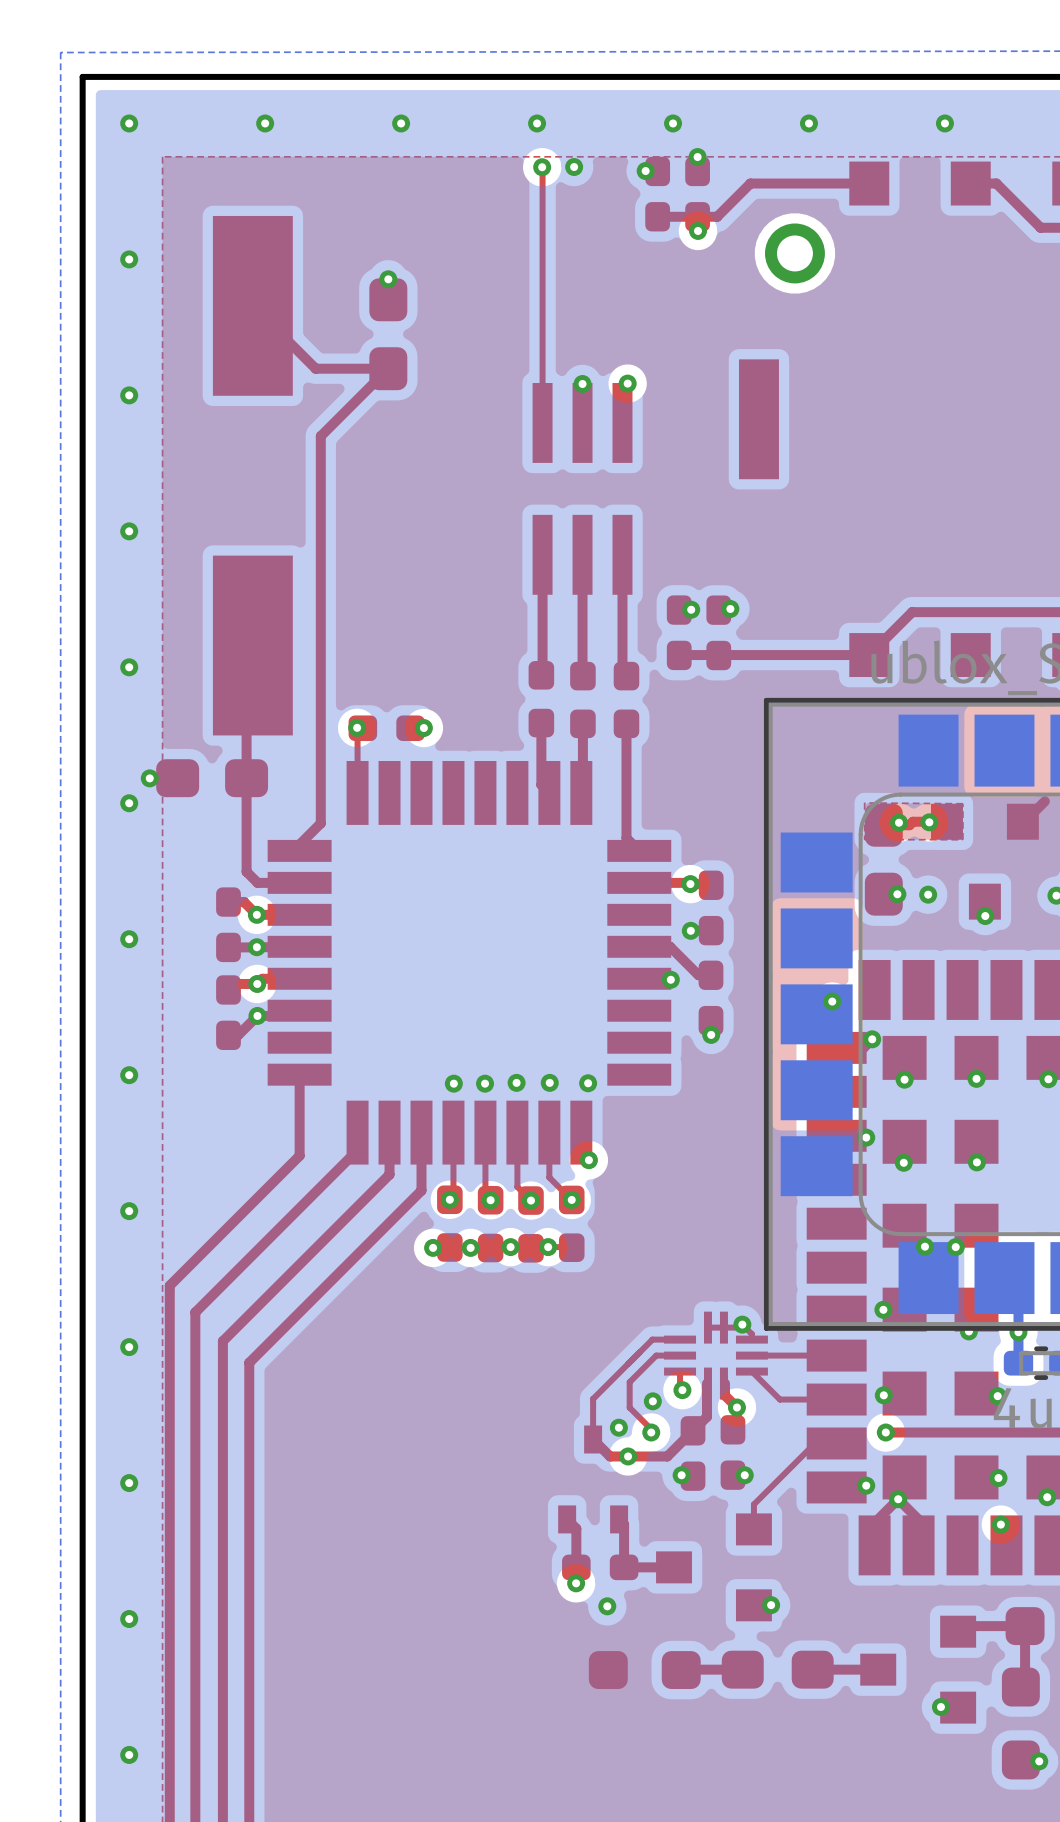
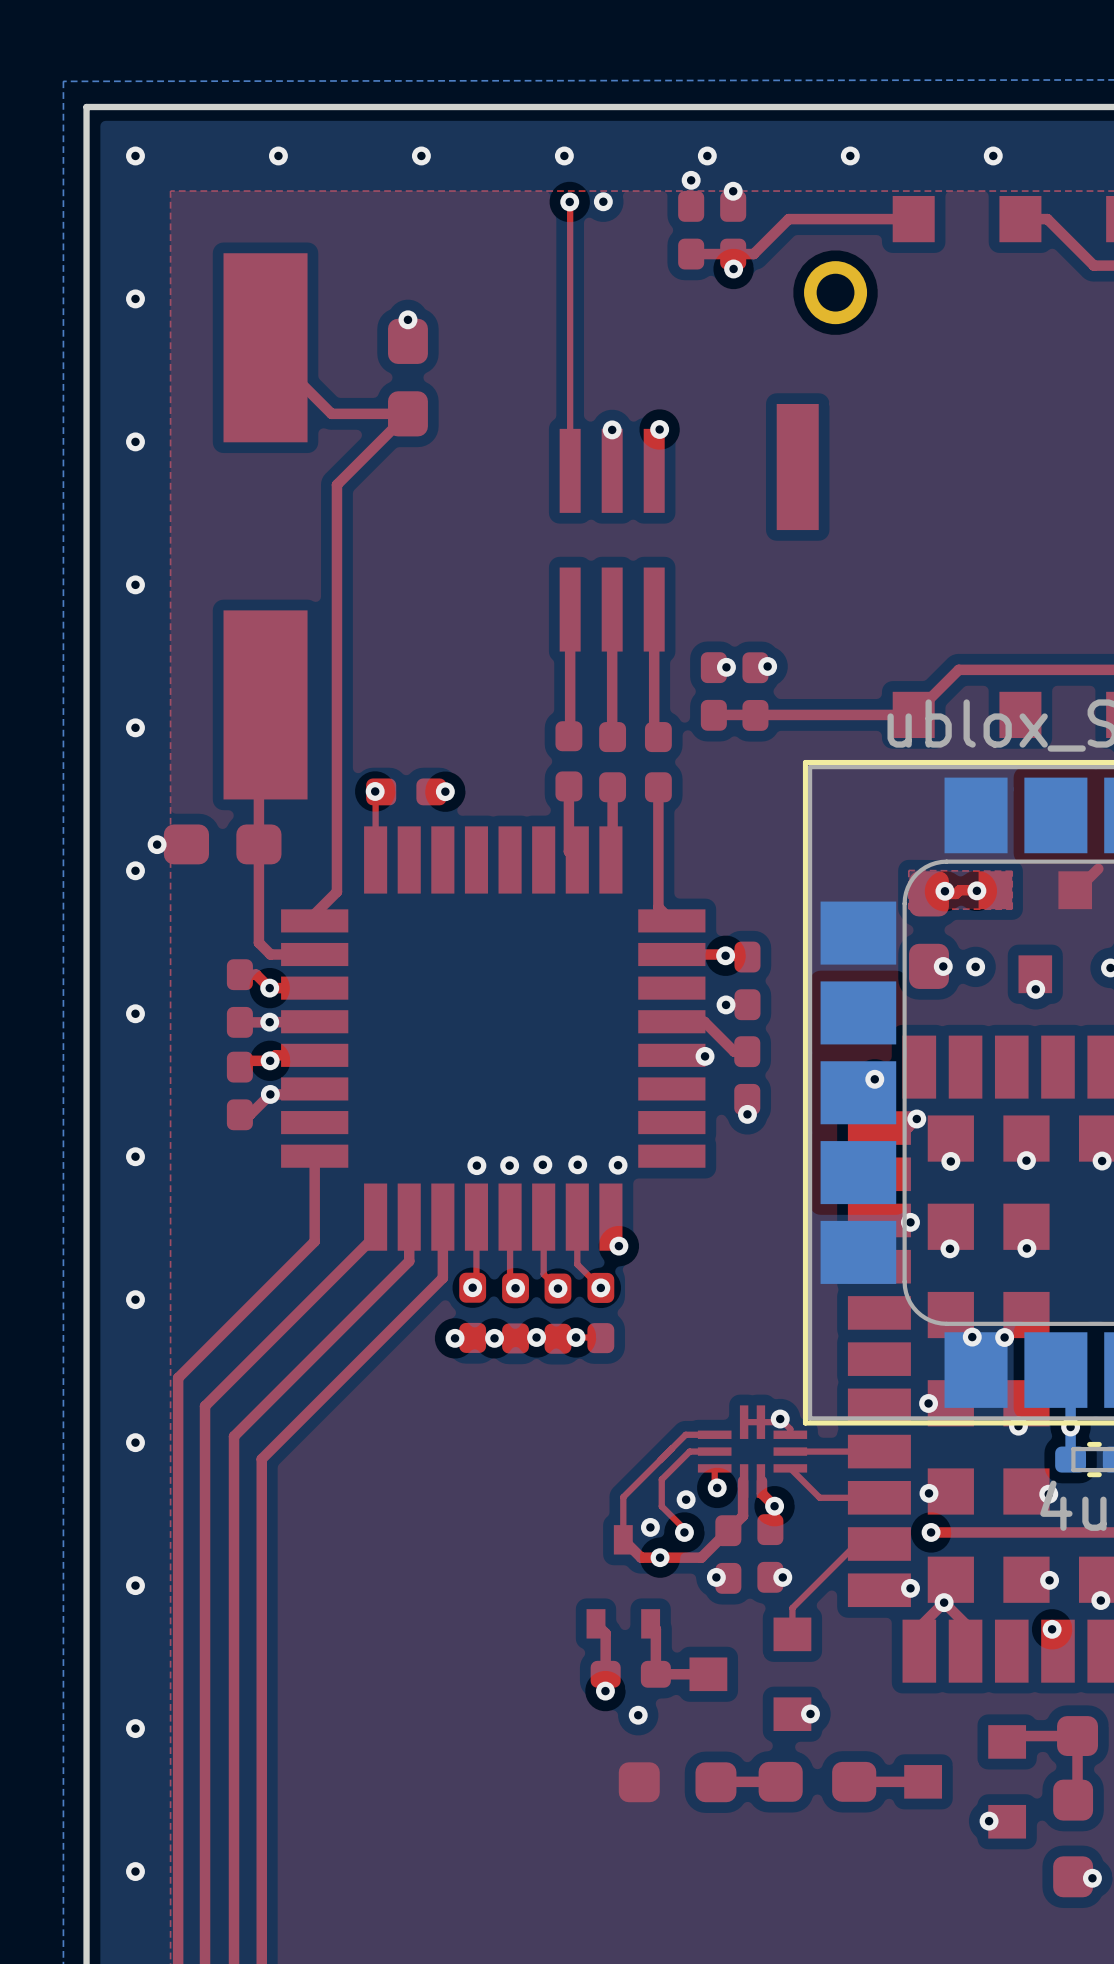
via position: (645, 171) -> (691, 180)

